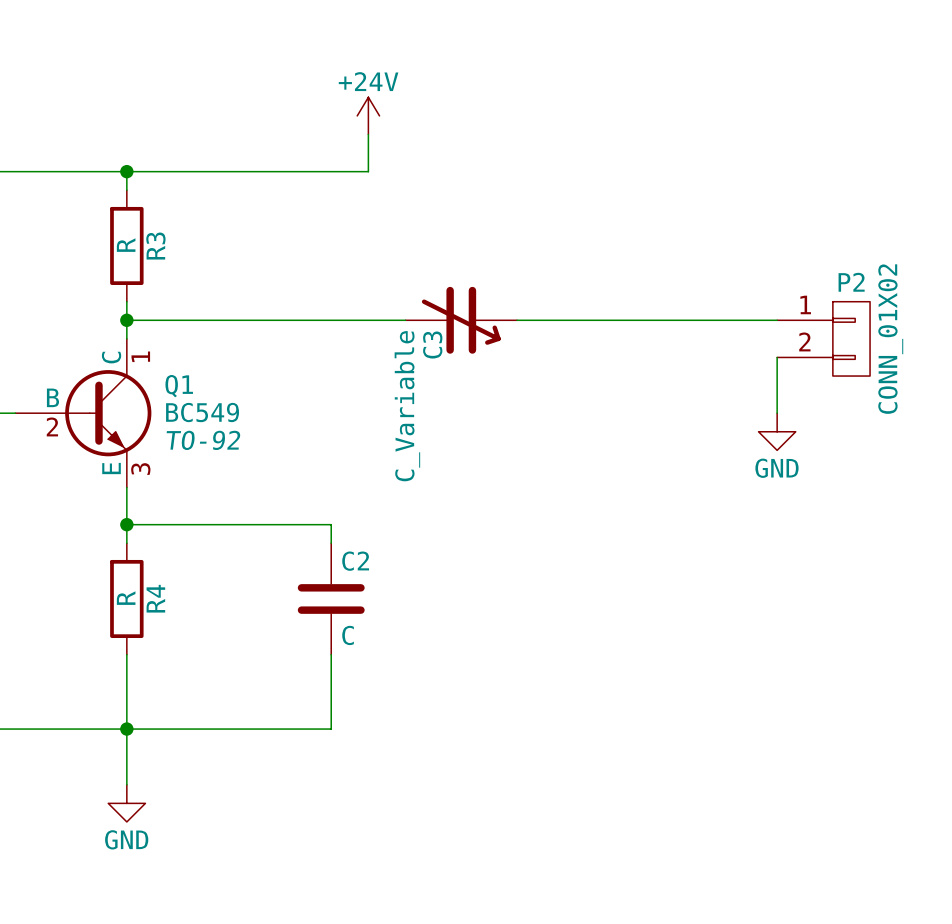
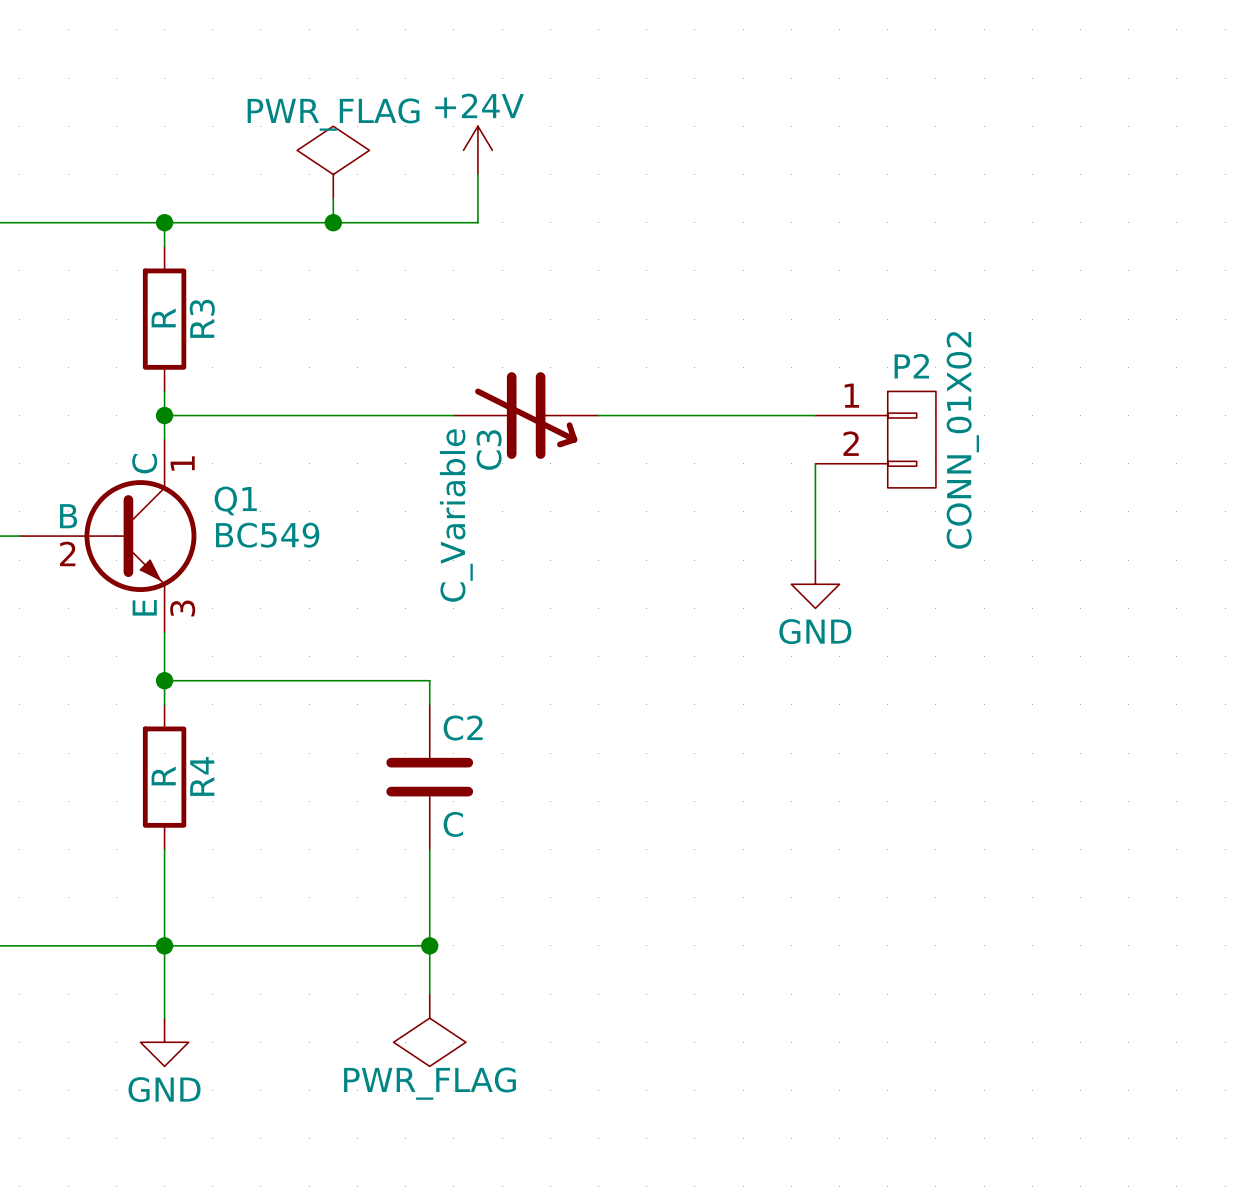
power symbol: none -> PWR_FLAG (333, 162)
wire: none -> (333, 198) (333, 222)
junction: none -> (333, 222)
C3 position: (461, 320) -> (526, 415)
wire: (628, 320) (777, 320) -> none
P2 position: (823, 338) -> (875, 439)
wire: none -> (815, 463) (815, 560)
wire: (777, 357) (777, 413) -> none
power symbol position: GND (777, 431) -> GND (815, 584)
Q1 text: TO-92 (203, 440) -> none
wire: none -> (429, 945) (429, 994)
junction: none -> (429, 945)
power symbol: none -> PWR_FLAG (429, 1030)

